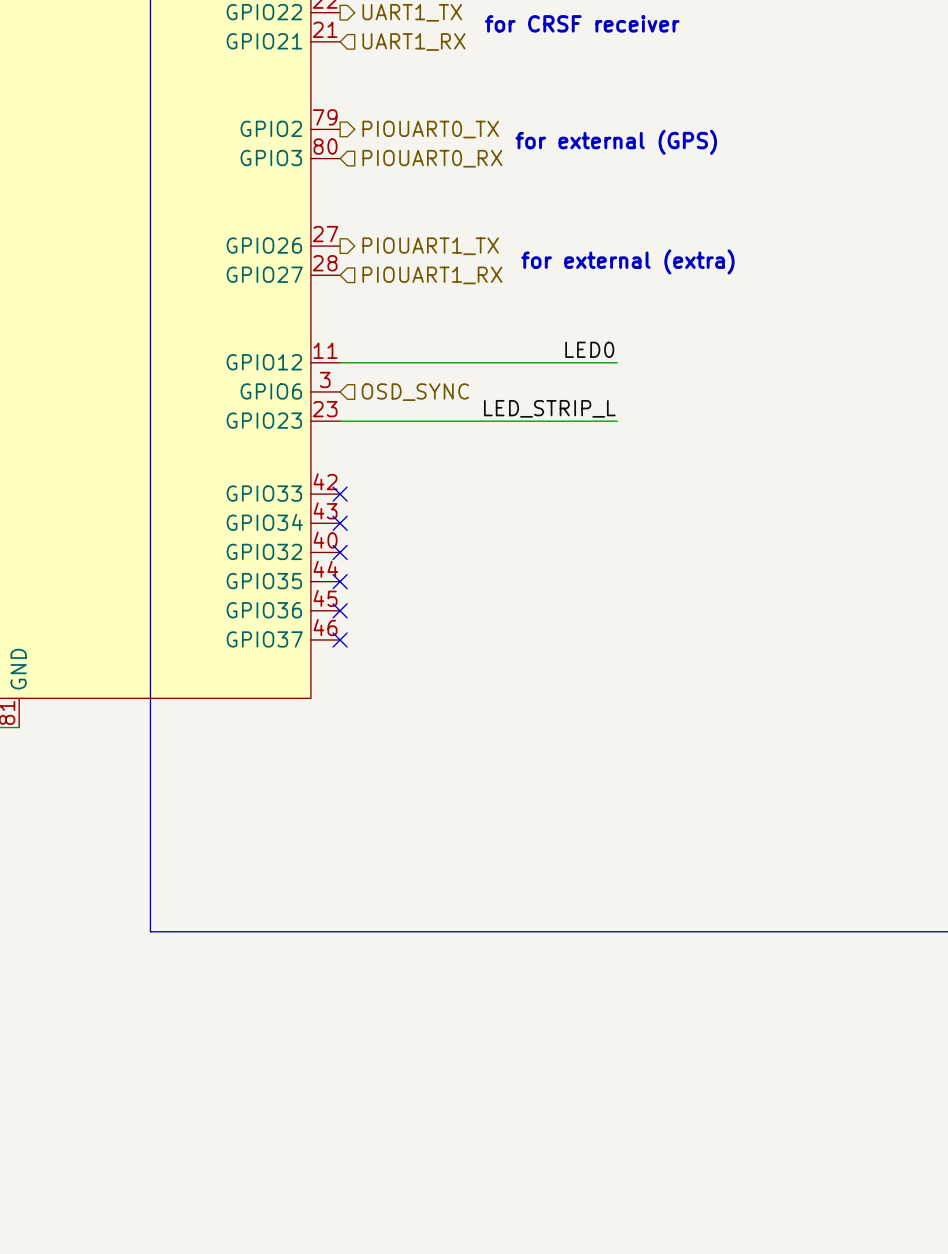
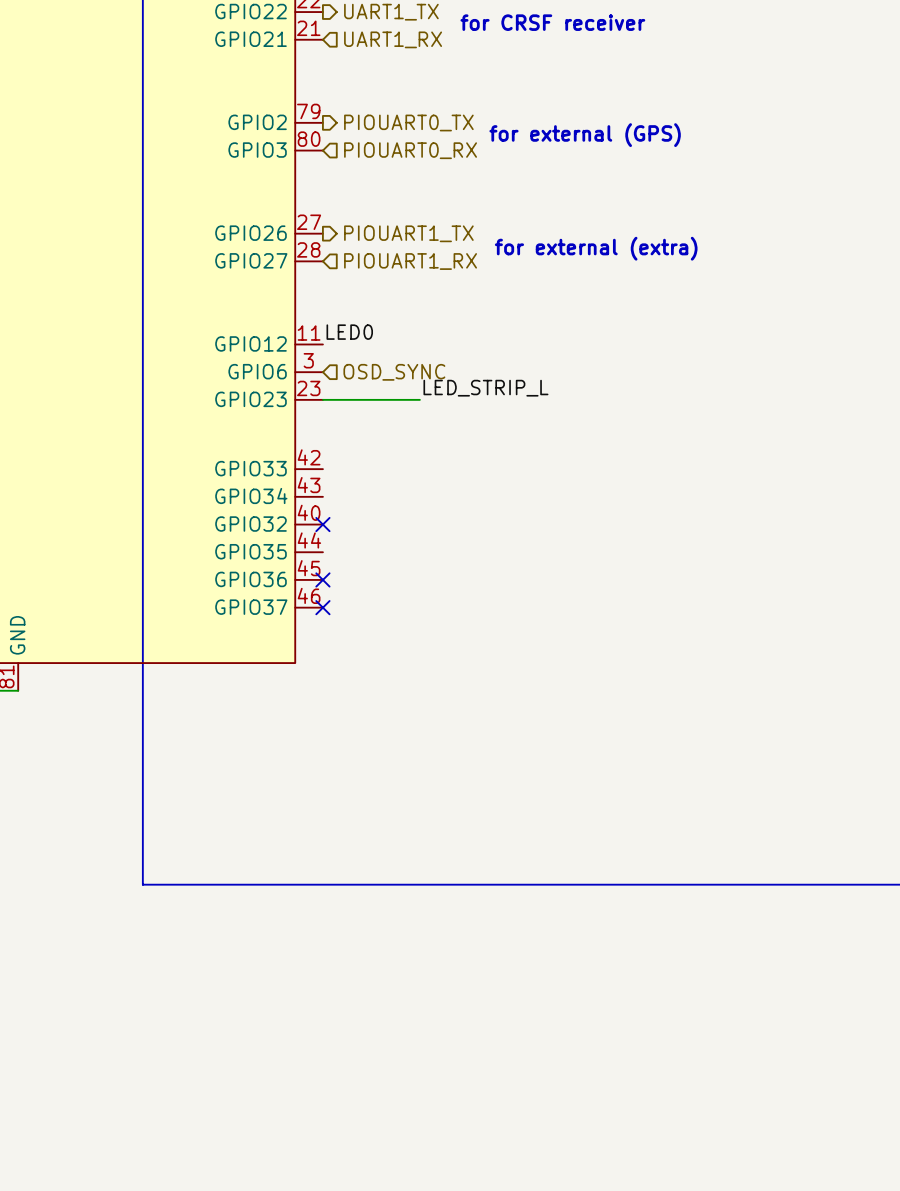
label position: LED0 (589, 349) -> LED0 (349, 332)
wire: (340, 362) (617, 362) -> none
label position: LED_STRIP_L (549, 408) -> LED_STRIP_L (485, 388)
wire: (442, 421) (617, 421) -> none
no-connect mark: (340, 494) -> none
no-connect mark: (340, 523) -> none
no-connect mark: (340, 581) -> none

